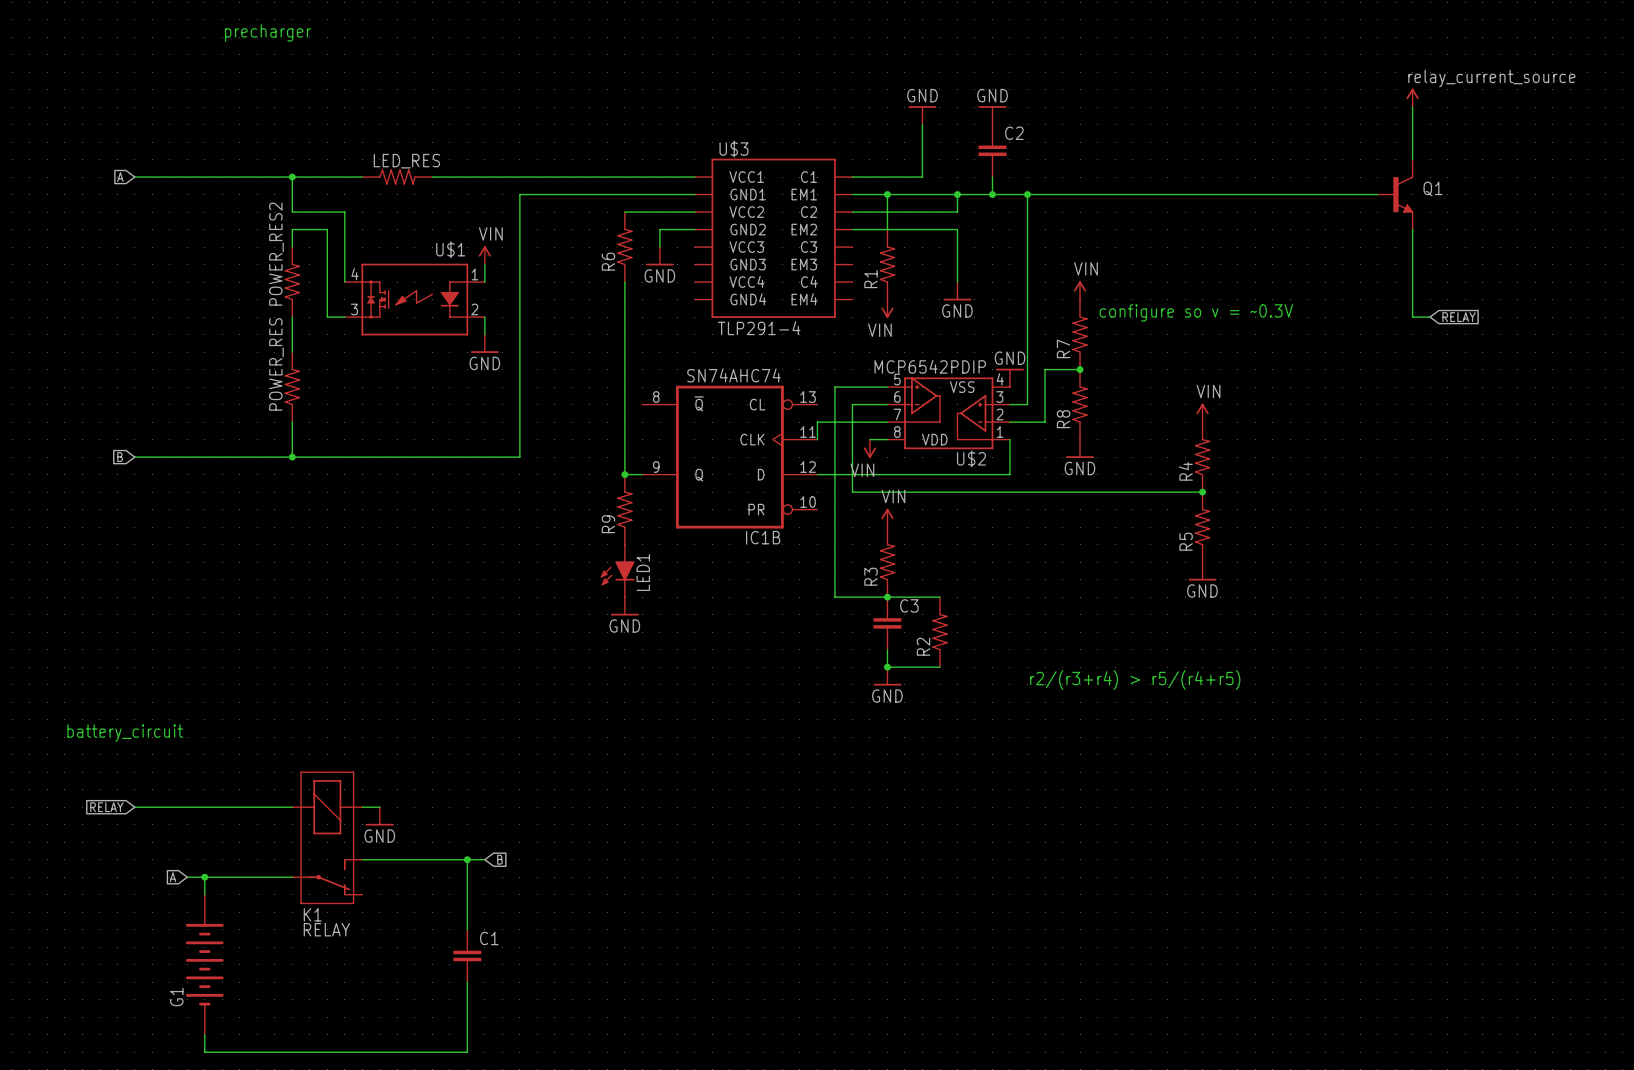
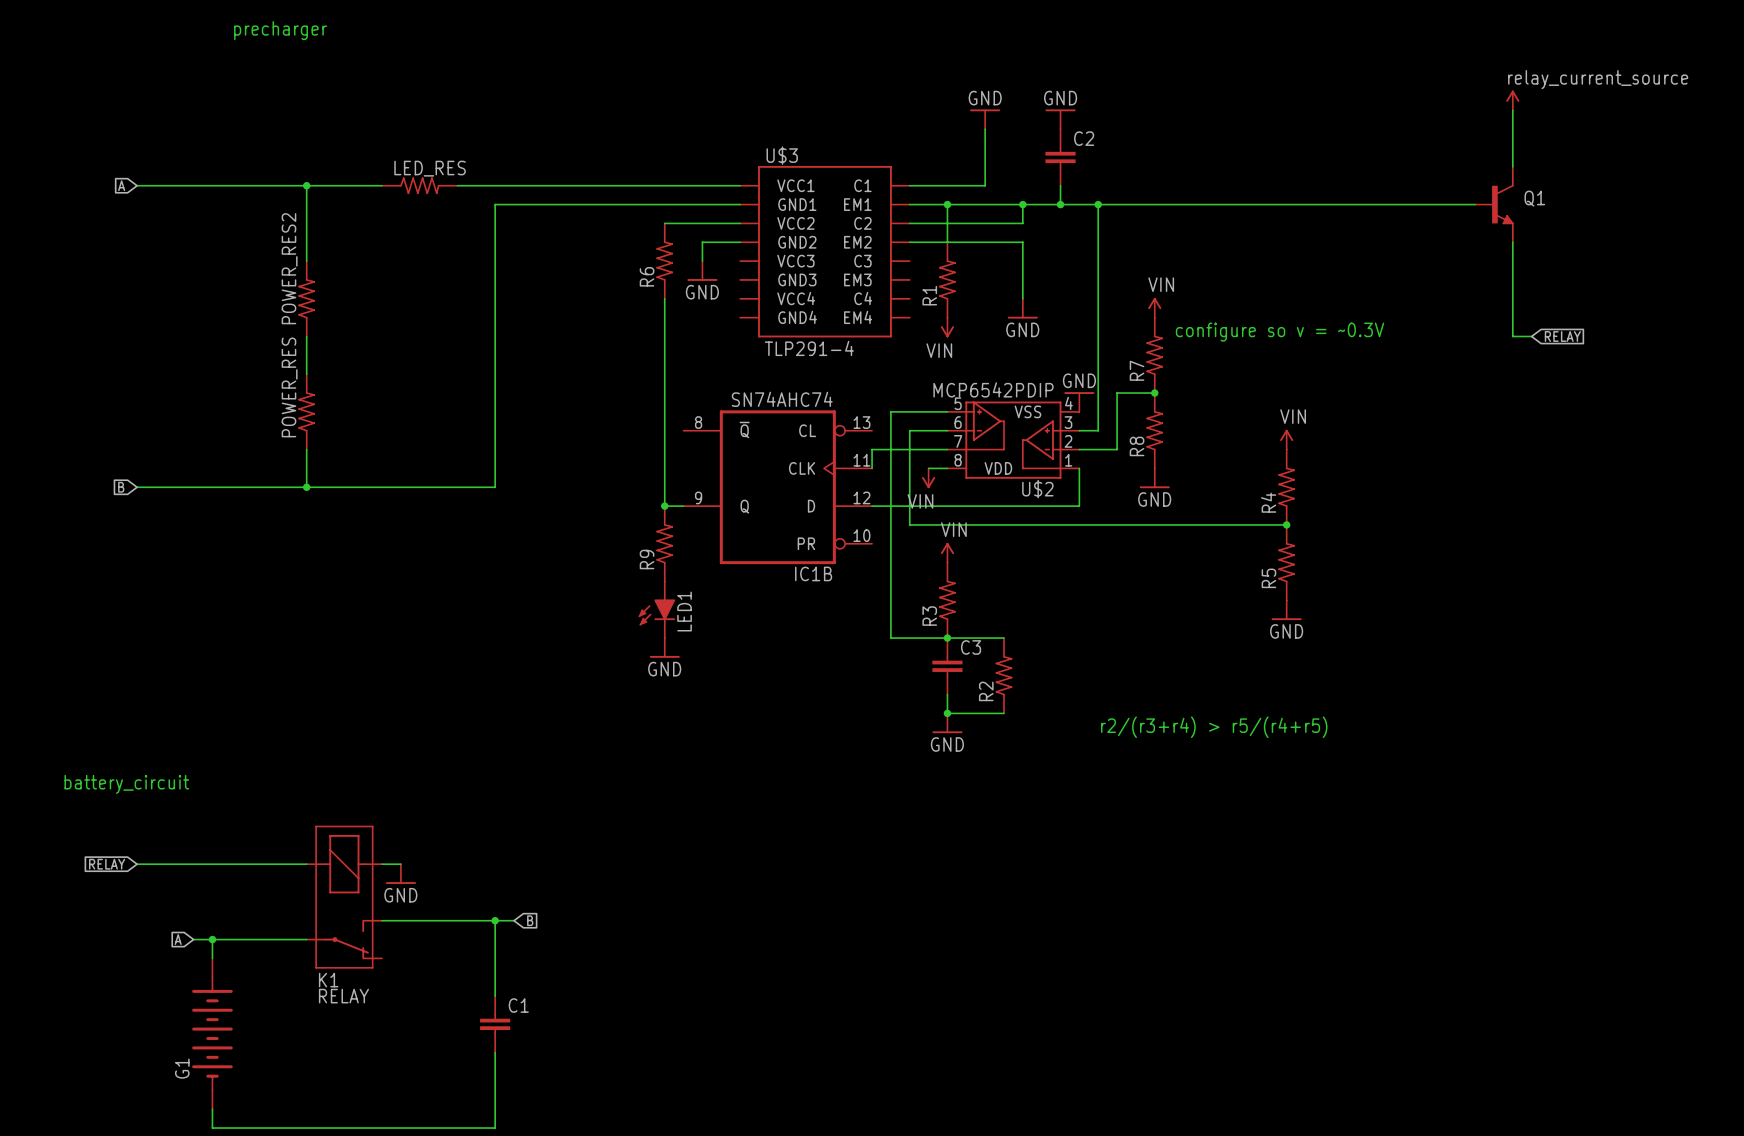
wire: (519, 194) (519, 457) (467, 457) -> (551, 204) (495, 204) (495, 487)
wire: (292, 212) (344, 212) (344, 282) -> (306, 223) (306, 242)
wire: (292, 229) (327, 229) (327, 317) (344, 317) -> none
power symbol: VIN (484, 255) -> none
wire: (484, 264) (484, 282) -> none
U$1: (414, 299) -> none
wire: (484, 317) (484, 334) -> none
power symbol: GND (484, 343) -> none

